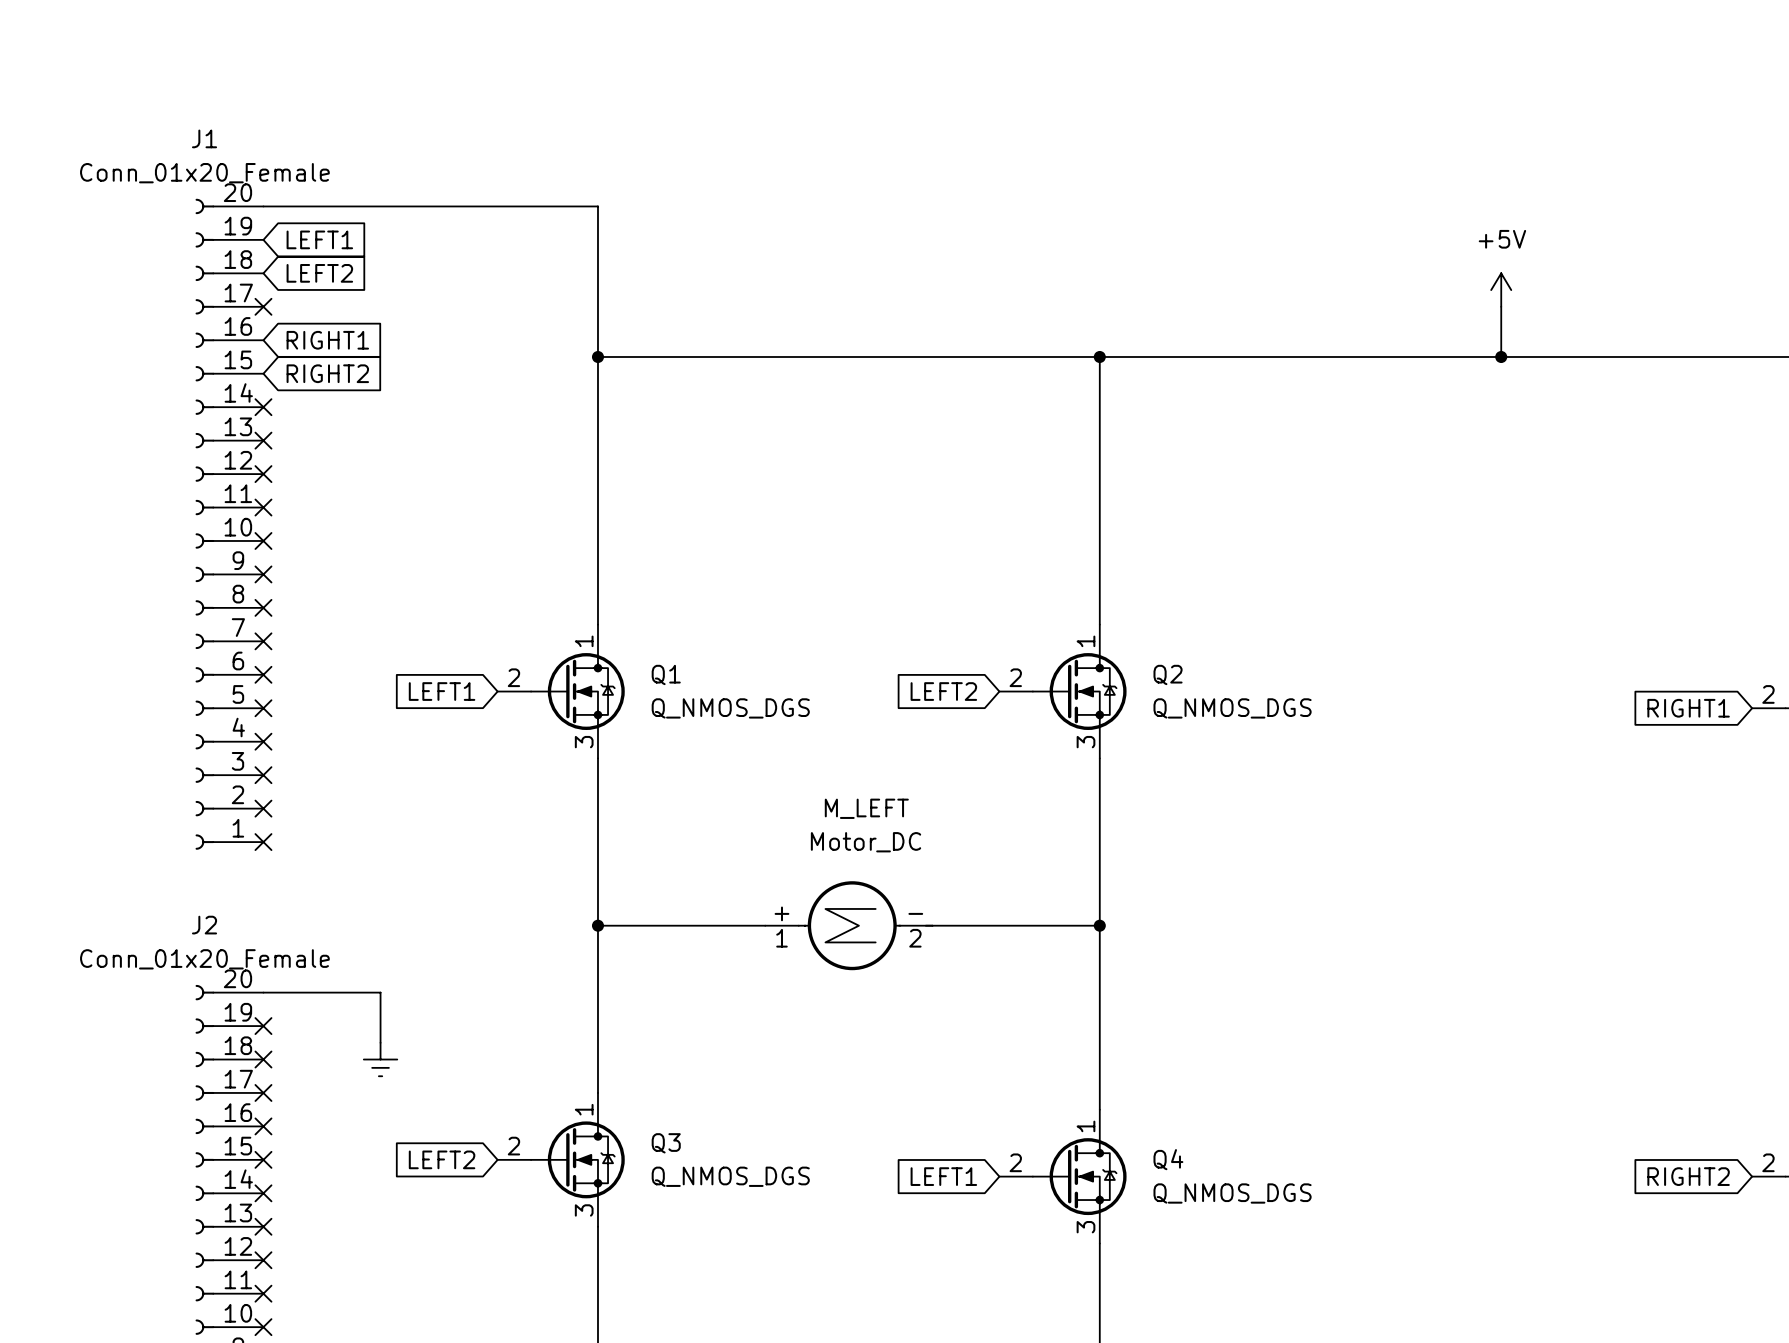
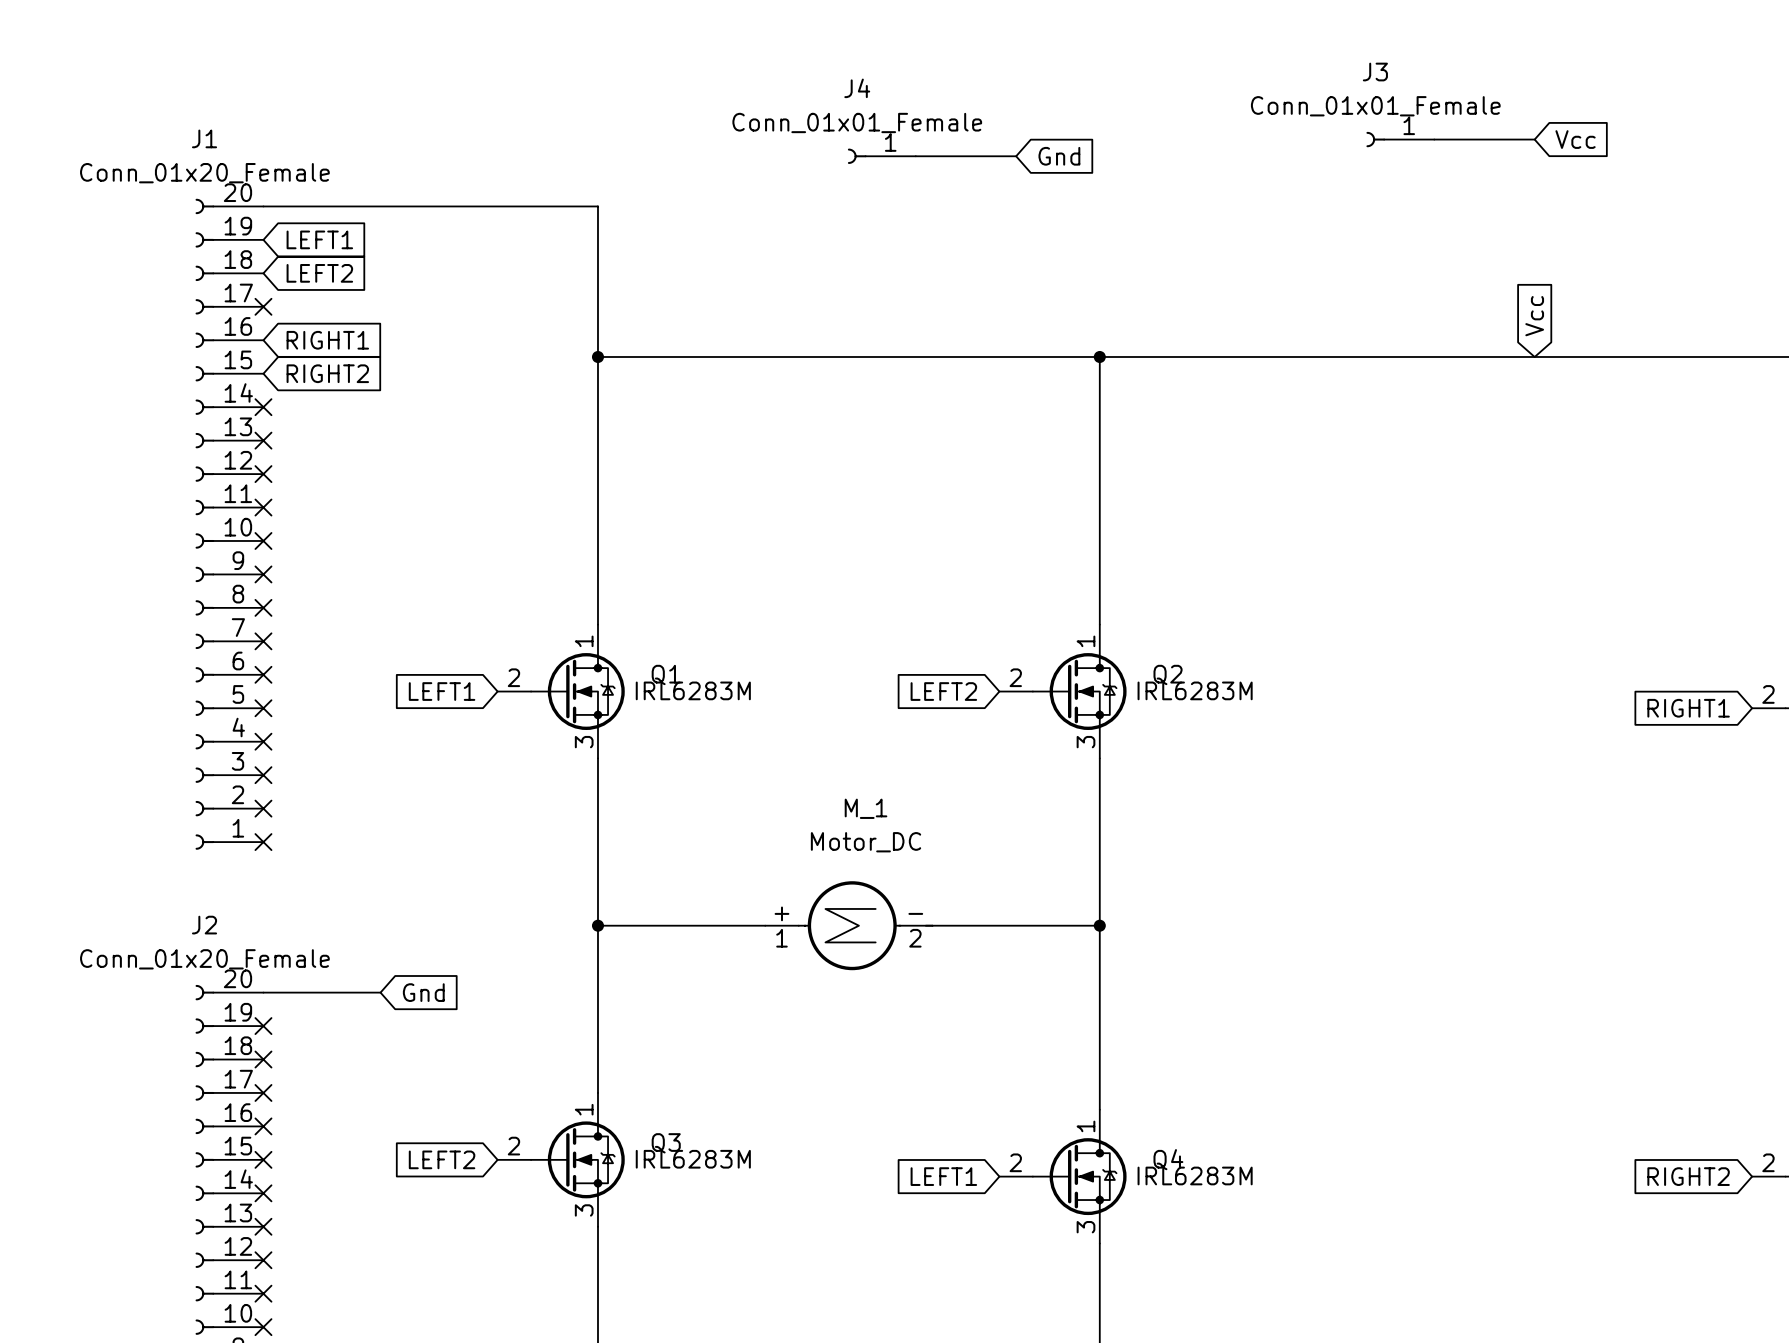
J3: none -> Conn_01x01_Female (1400, 139)
wire: none -> (1434, 139) (1534, 139)
global label: none -> Vcc (1575, 139)
J4: none -> Conn_01x01_Female (881, 156)
wire: none -> (915, 156) (1016, 156)
global label: none -> Gnd (1059, 156)
power symbol: +5V (1501, 290) -> none
wire: (1501, 306) (1501, 356) -> none
global label: none -> Vcc (1534, 316)
junction: (1501, 356) -> none
Q1 value: Q_NMOS_DGS (730, 708) -> IRL6283M (693, 690)
Q2 value: Q_NMOS_DGS (1232, 708) -> IRL6283M (1195, 690)
M_LEFT name: M_LEFT (866, 808) -> M_1 (866, 808)
wire: (380, 992) (380, 1042) -> none
global label: none -> Gnd (423, 992)
power symbol: (380, 1059) -> none
Q3 value: Q_NMOS_DGS (730, 1176) -> IRL6283M (693, 1159)
Q4 value: Q_NMOS_DGS (1232, 1193) -> IRL6283M (1195, 1175)

